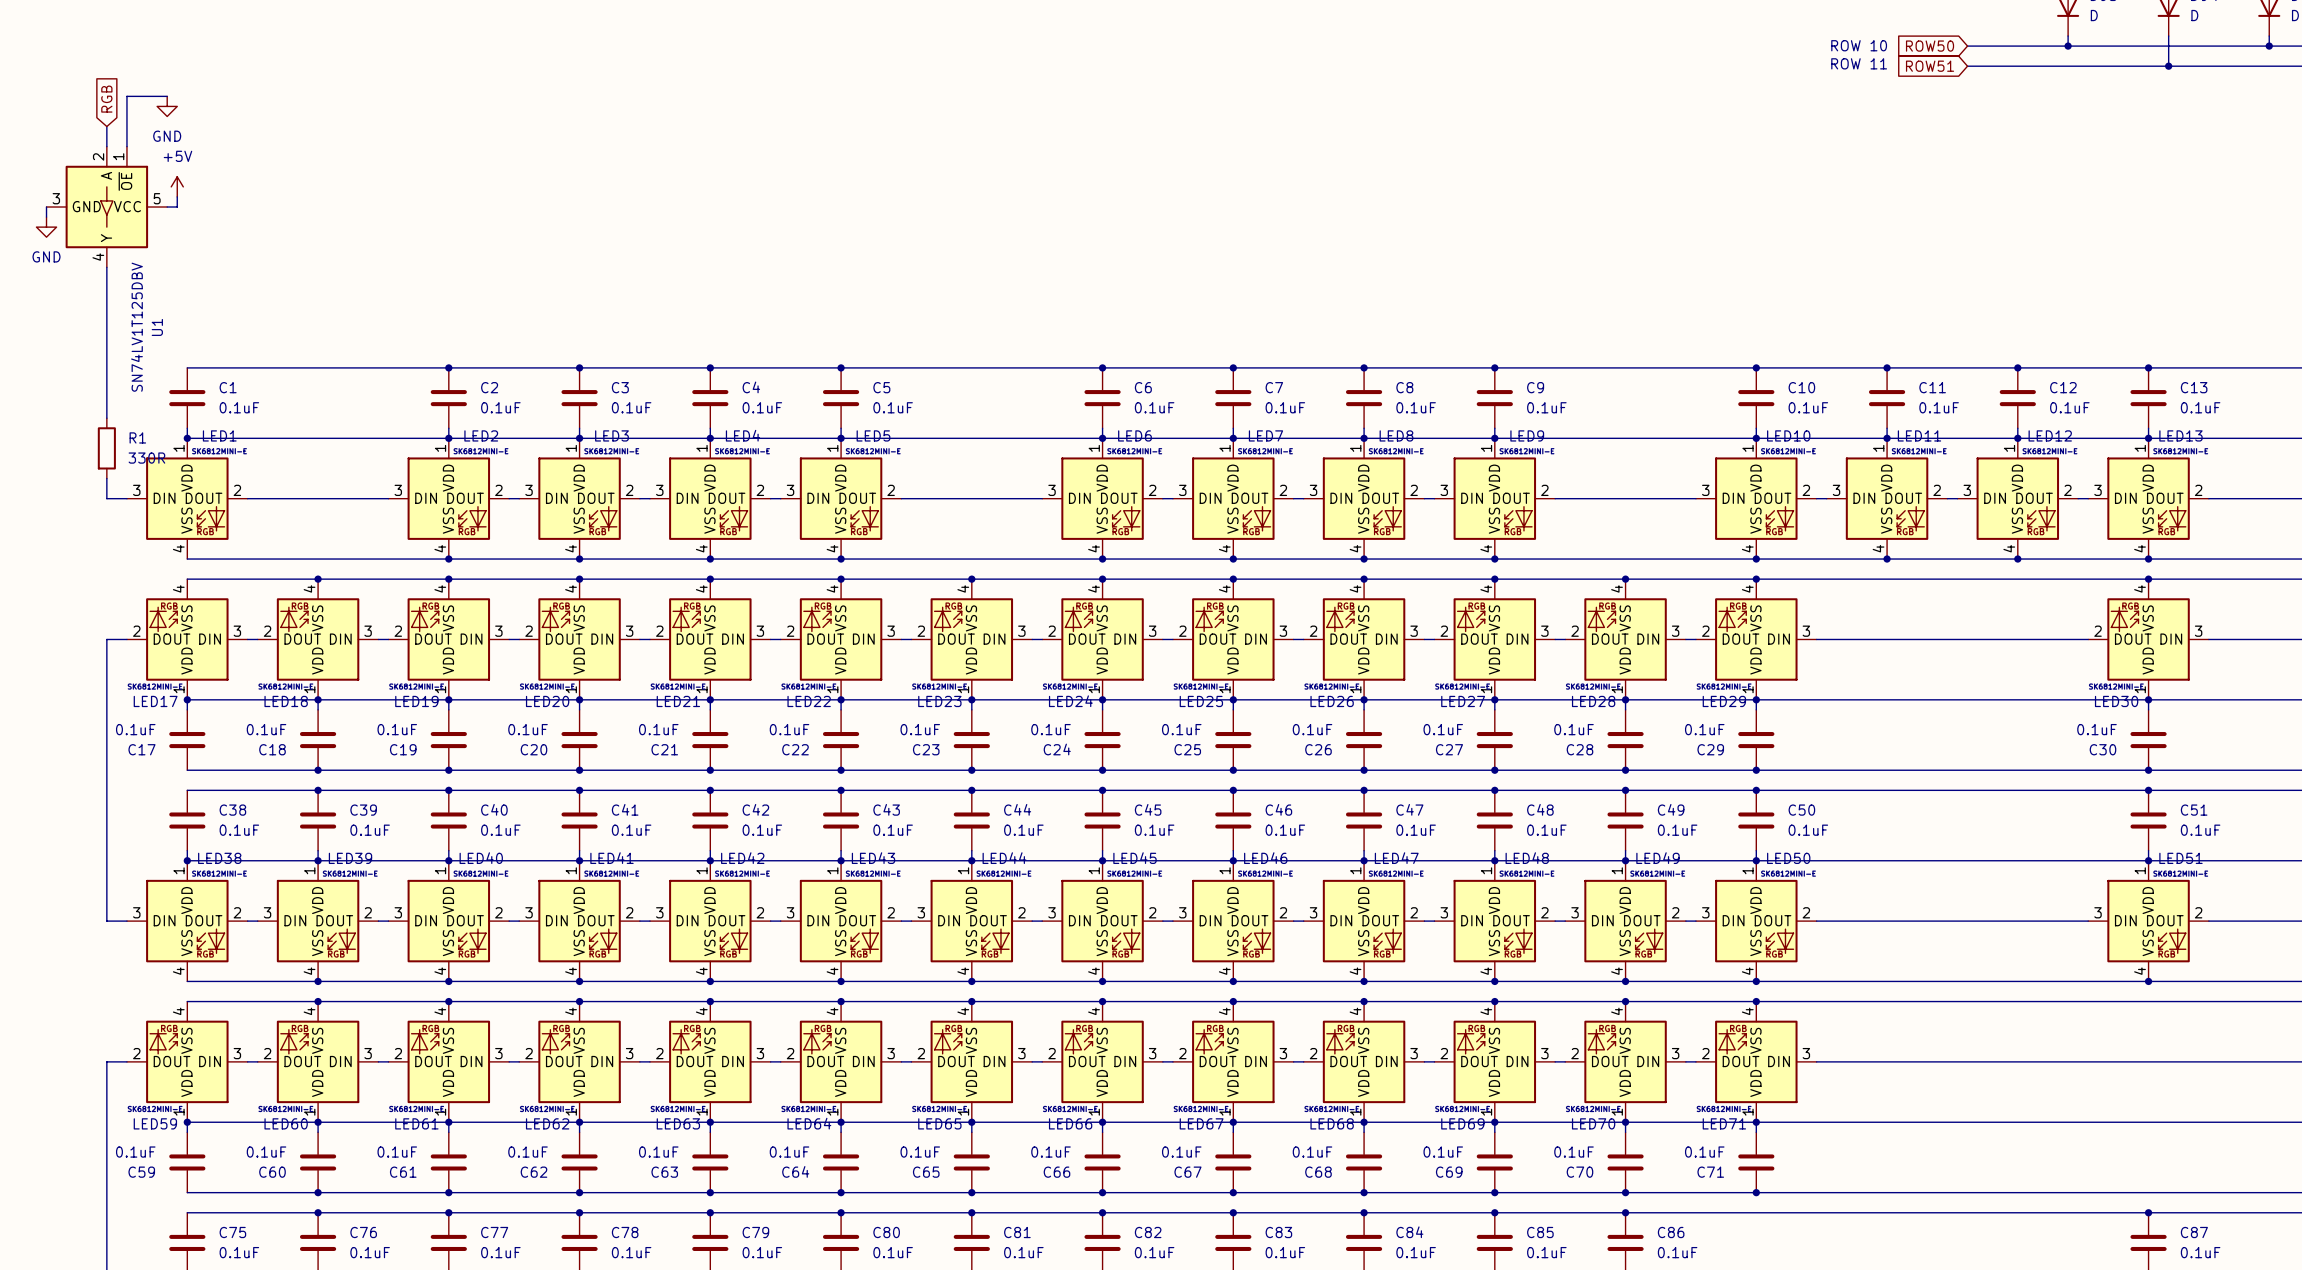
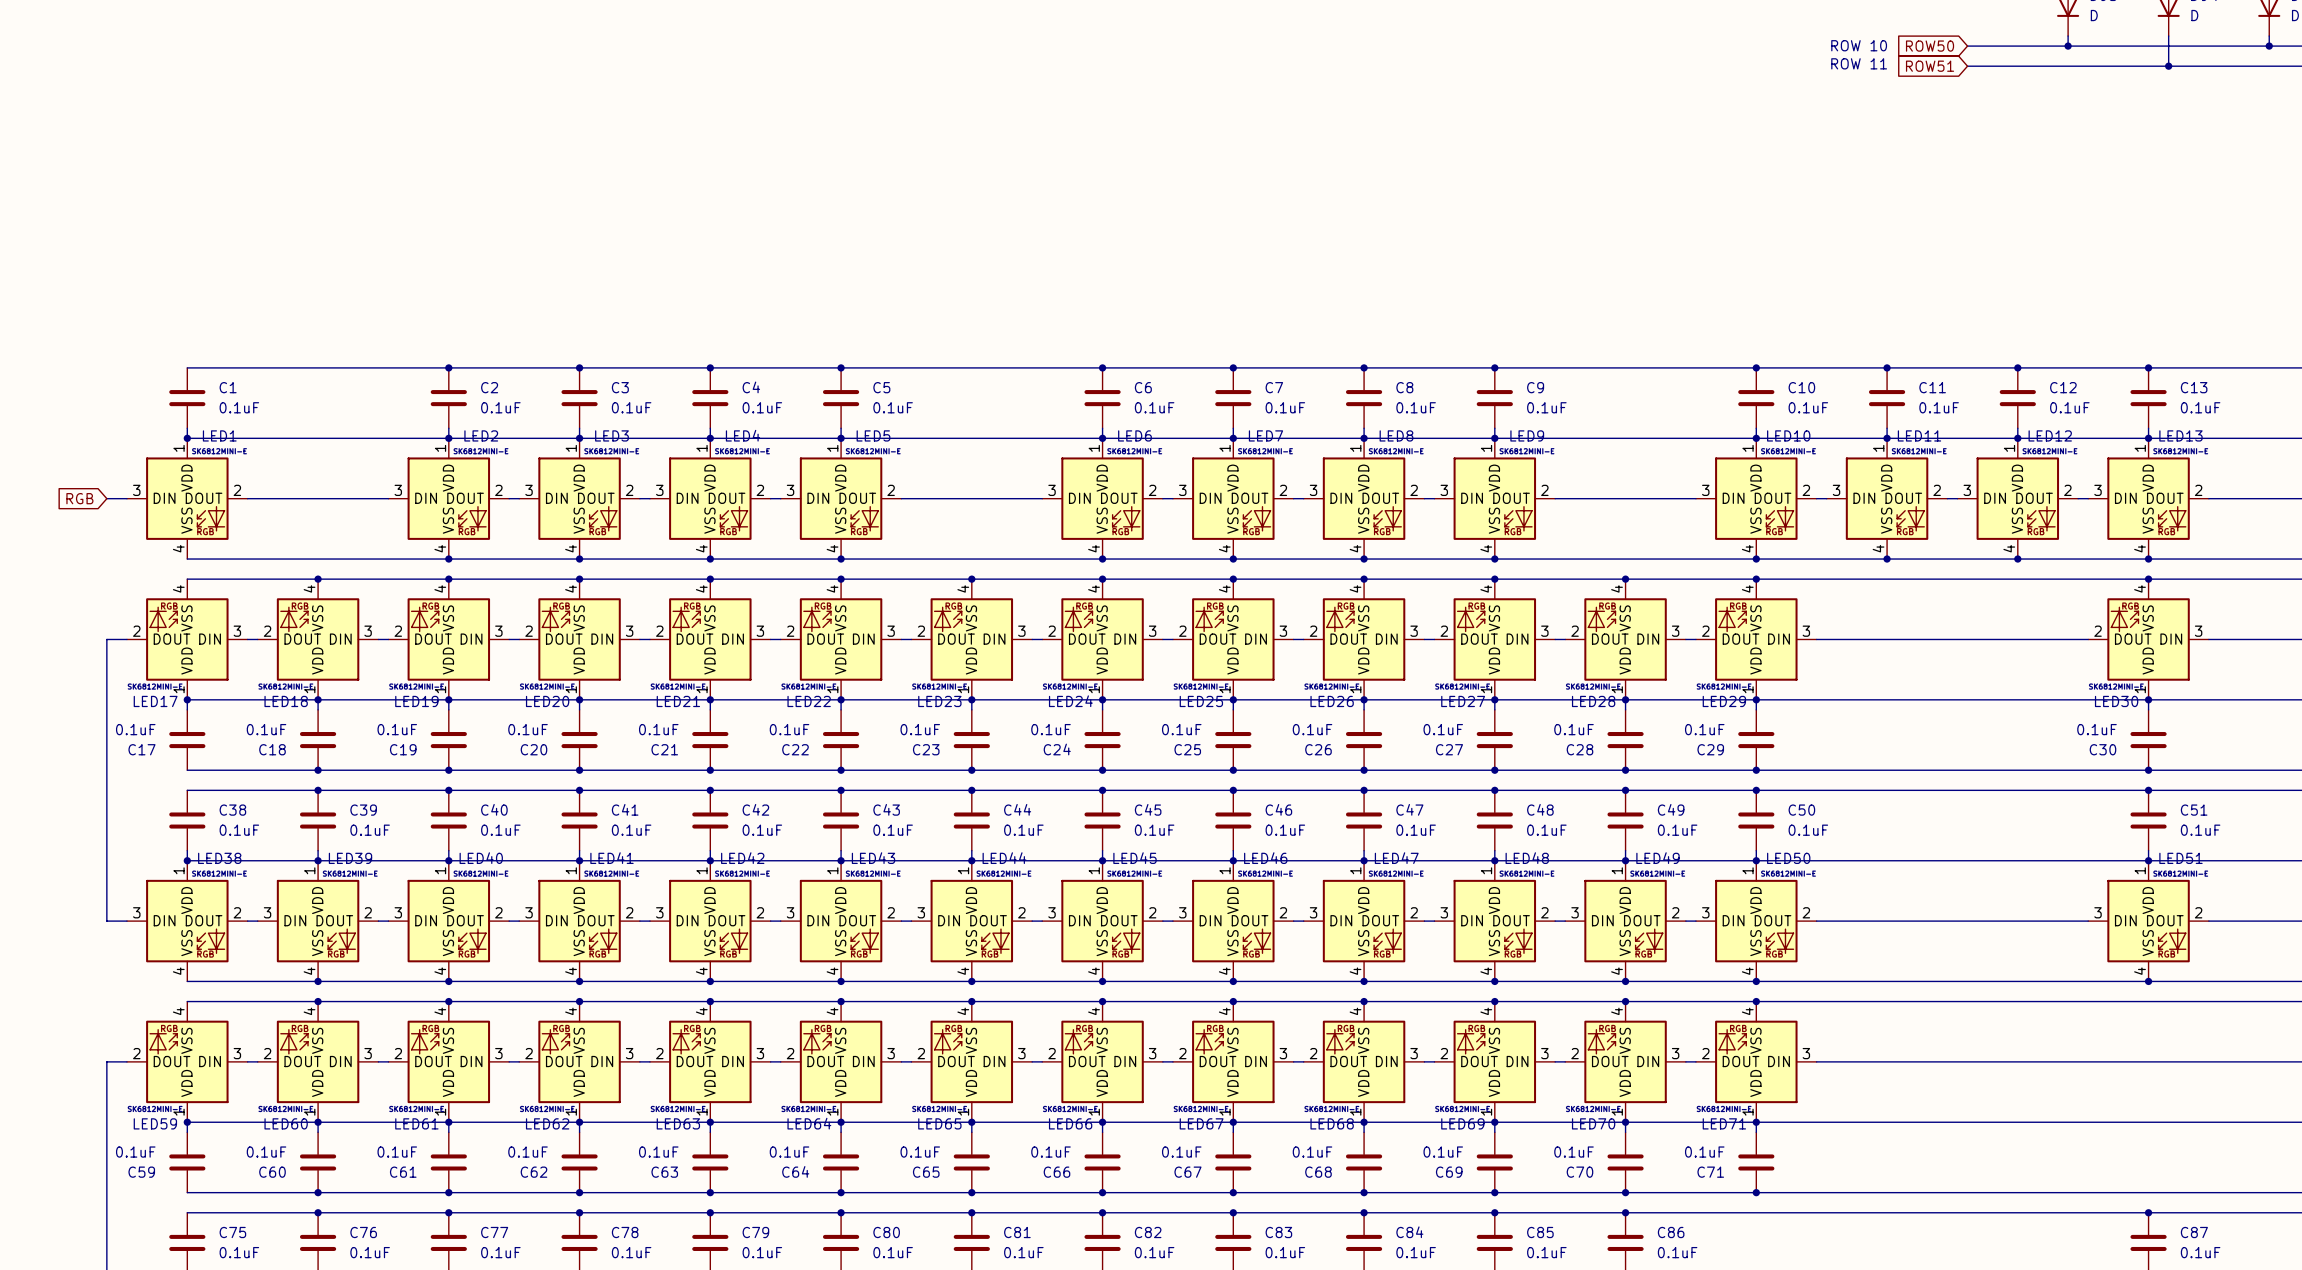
wire: (167, 96) (126, 96) (126, 146) -> none
global label: RGB (106, 99) -> none
power symbol: GND (167, 106) -> none
wire: (106, 126) (106, 146) -> none
power symbol: +5V (177, 186) -> none
wire: (177, 196) (177, 207) (167, 207) -> none
wire: (46, 207) (46, 217) -> none
U1: SN74LV1T125DBV (106, 207) -> none
power symbol: GND (46, 227) -> none
wire: (106, 267) (106, 418) -> none
R1: 330R (106, 448) -> none
wire: (106, 478) (106, 498) -> none
global label: none -> RGB (79, 498)

